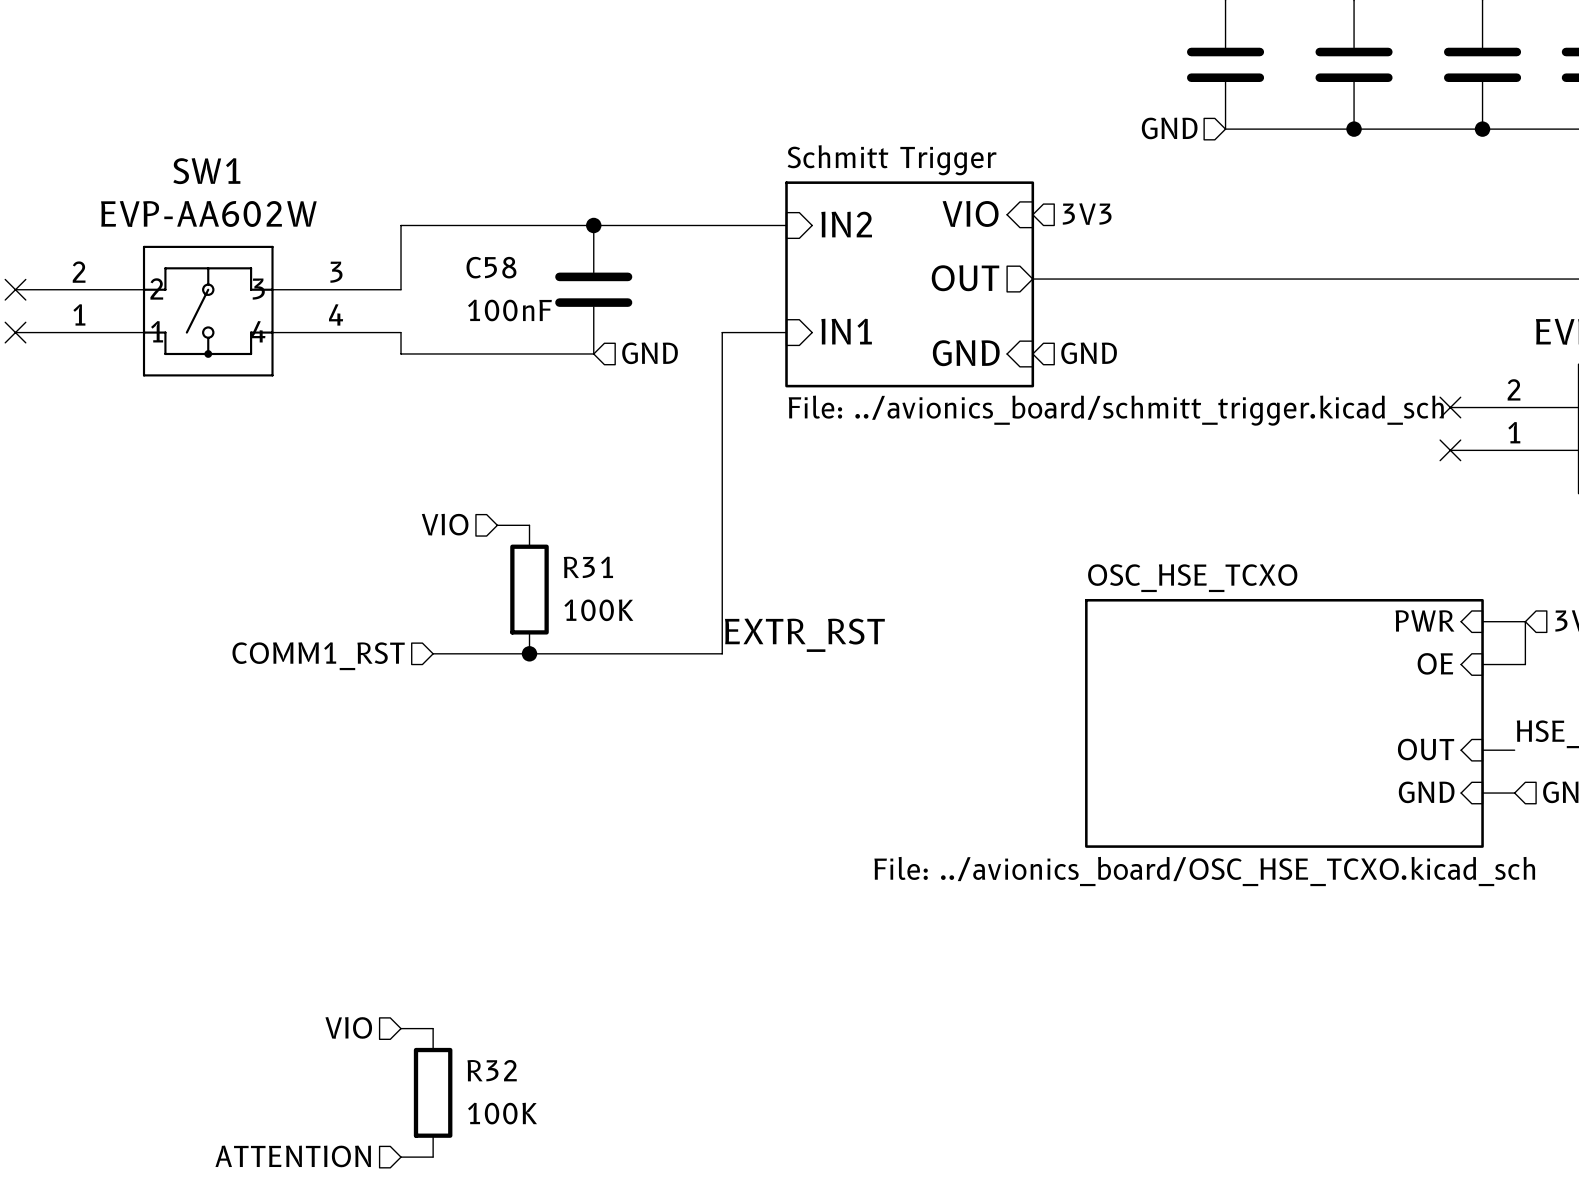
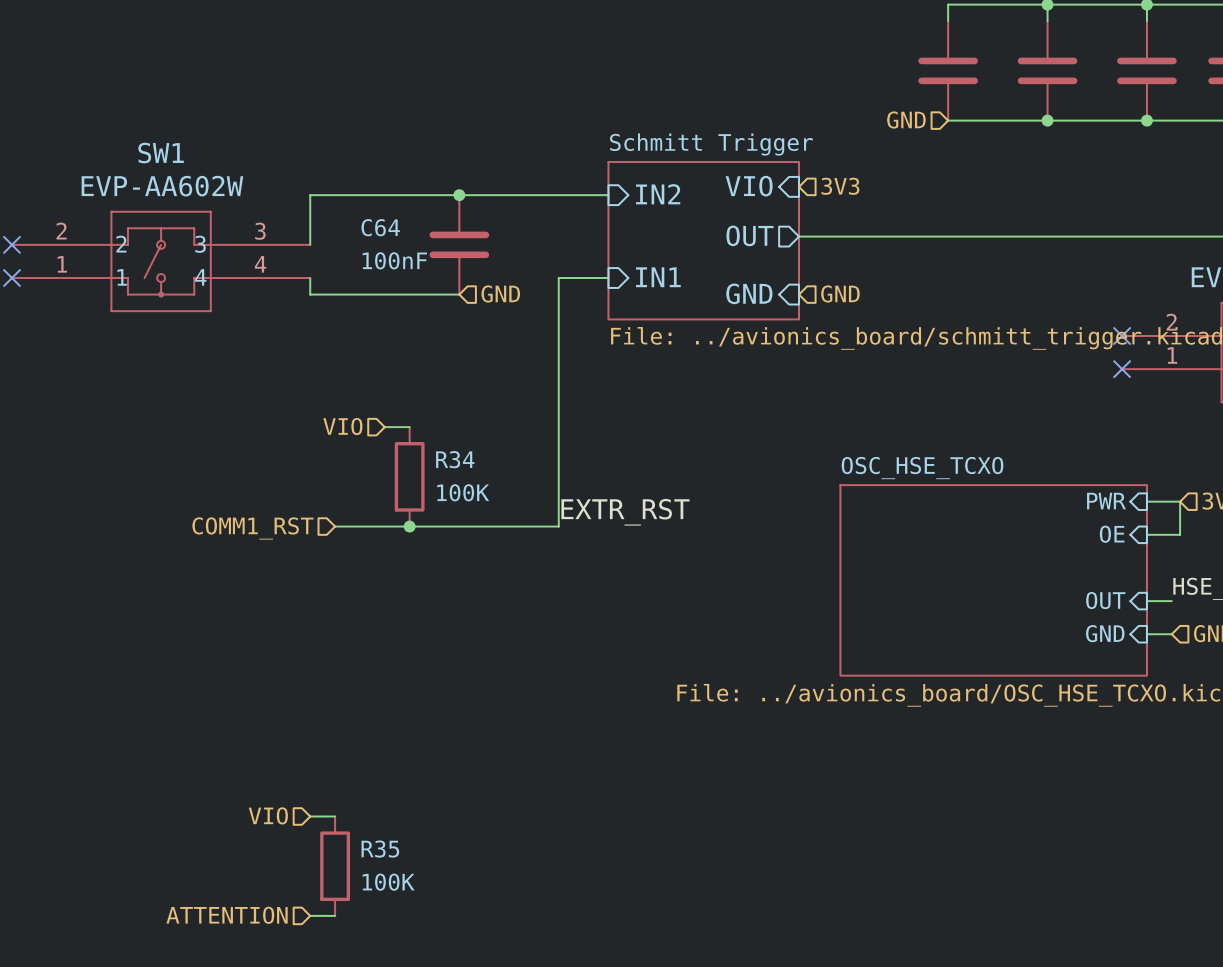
C58 name: C58 (491, 267) -> C64 (380, 227)
R31 name: R31 (588, 567) -> R34 (455, 459)
R32 name: R32 (492, 1070) -> R35 (380, 849)

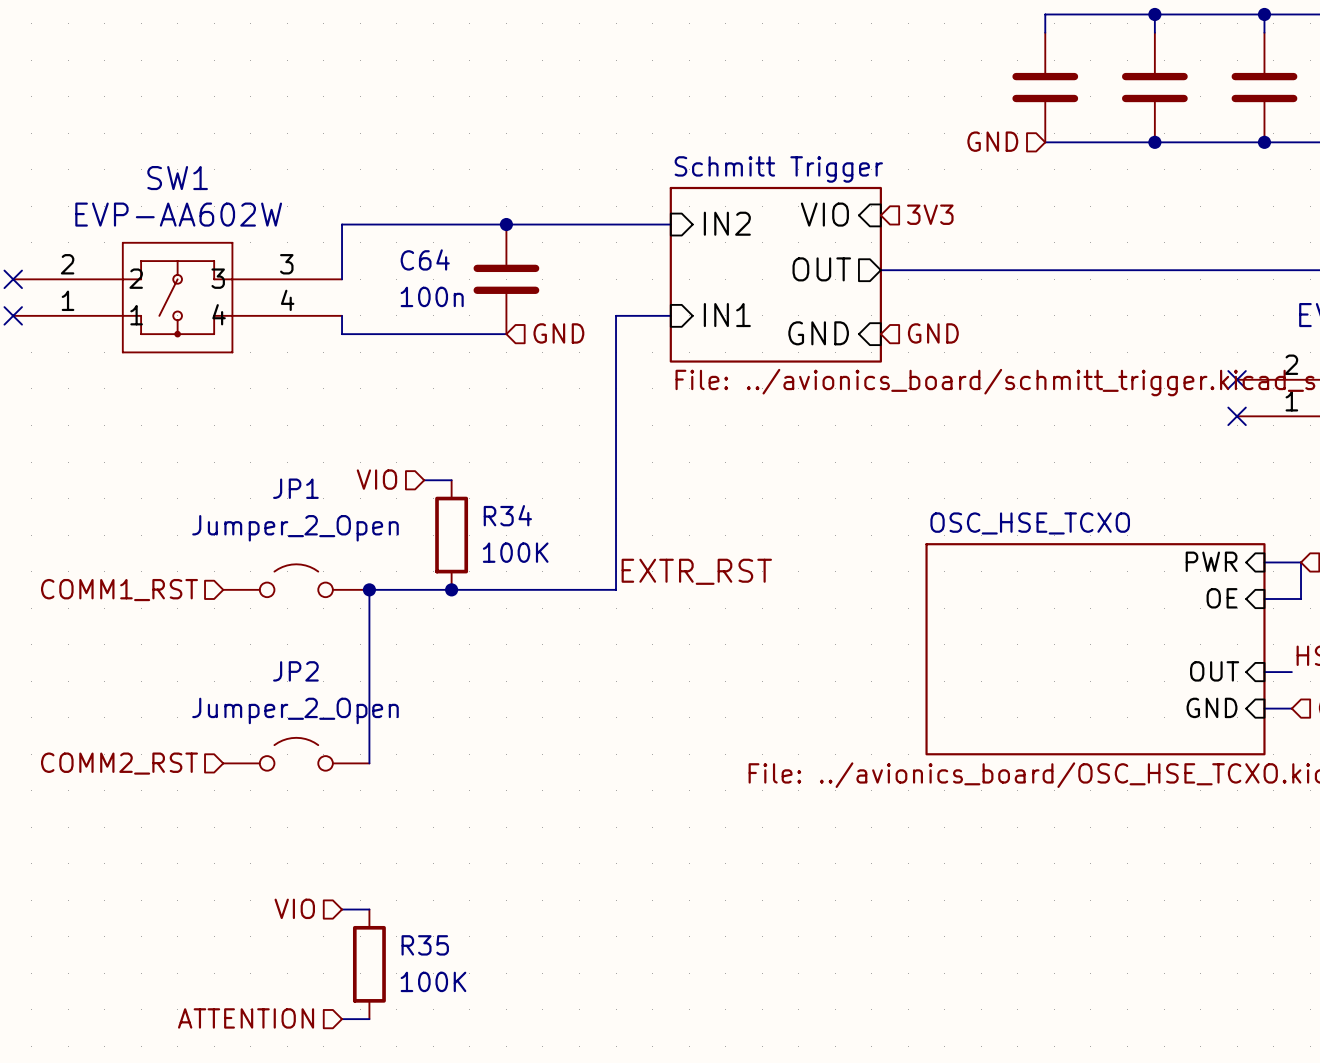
C64 value: 100nF (394, 260) -> 100n (432, 296)
JP1: none -> Jumper_2_Open (296, 580)
wire: none -> (369, 589) (369, 763)
junction: none -> (369, 589)
hierarchical label position: COMM1_RST (252, 528) -> COMM1_RST (119, 590)
JP2: none -> Jumper_2_Open (296, 754)
hierarchical label: none -> COMM2_RST (119, 763)

